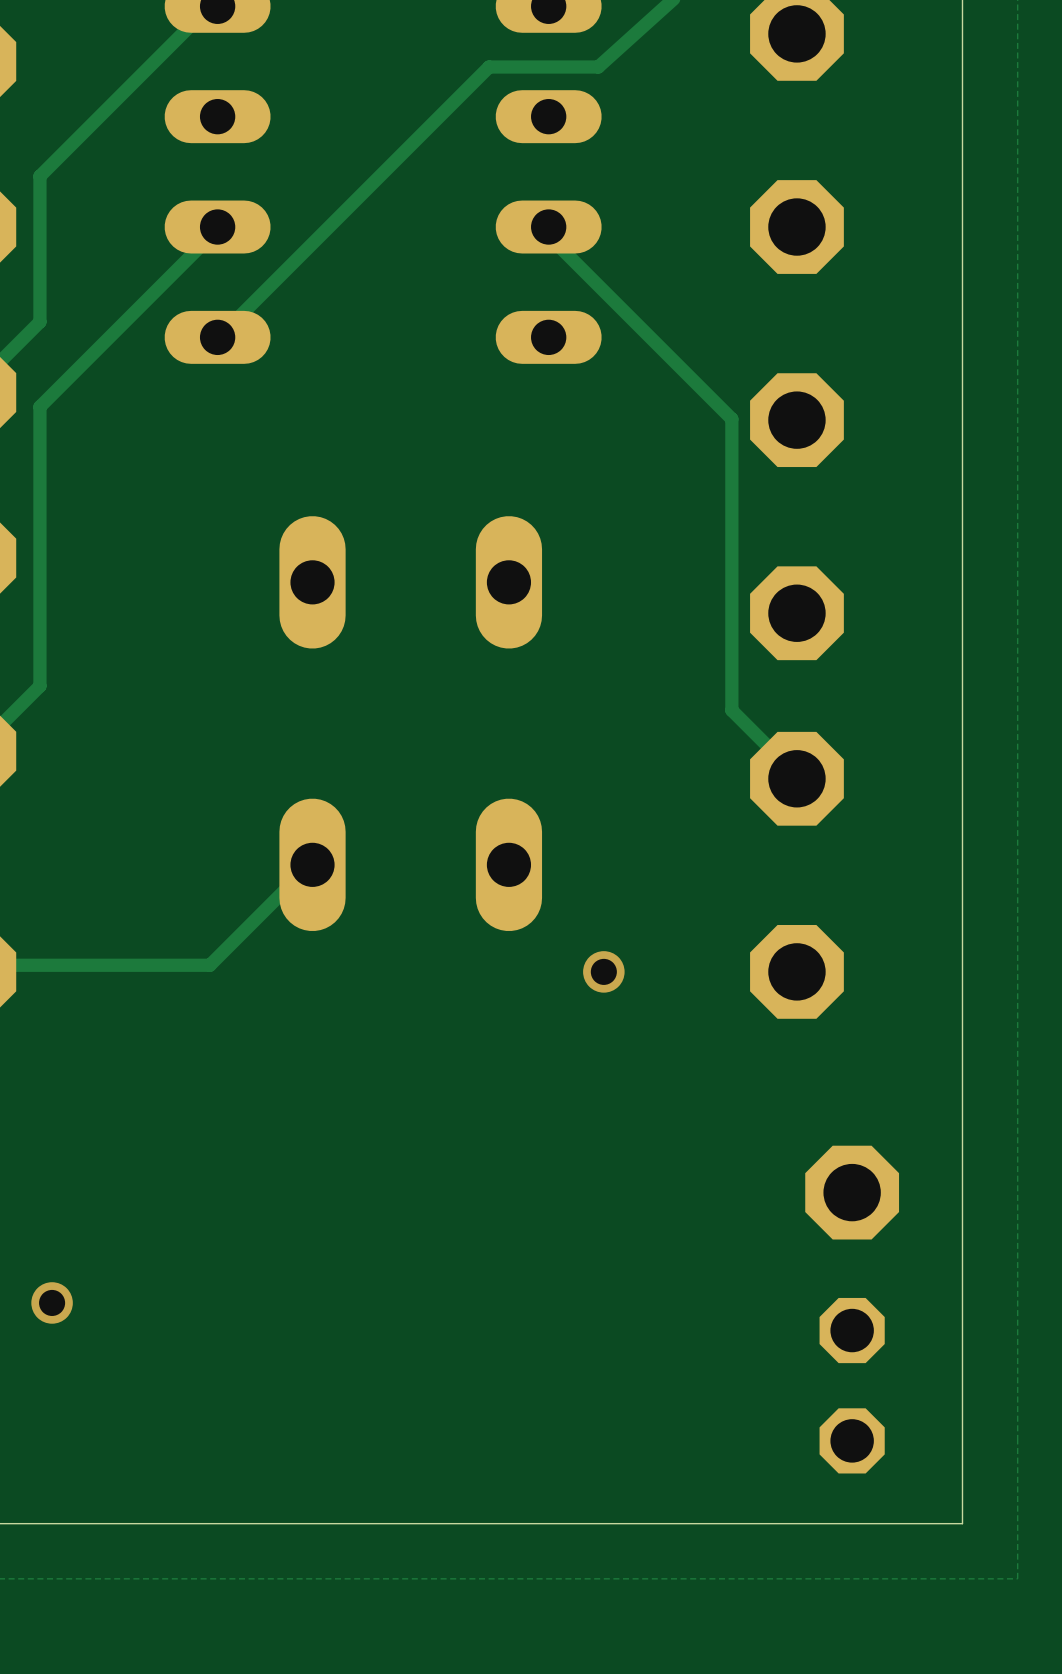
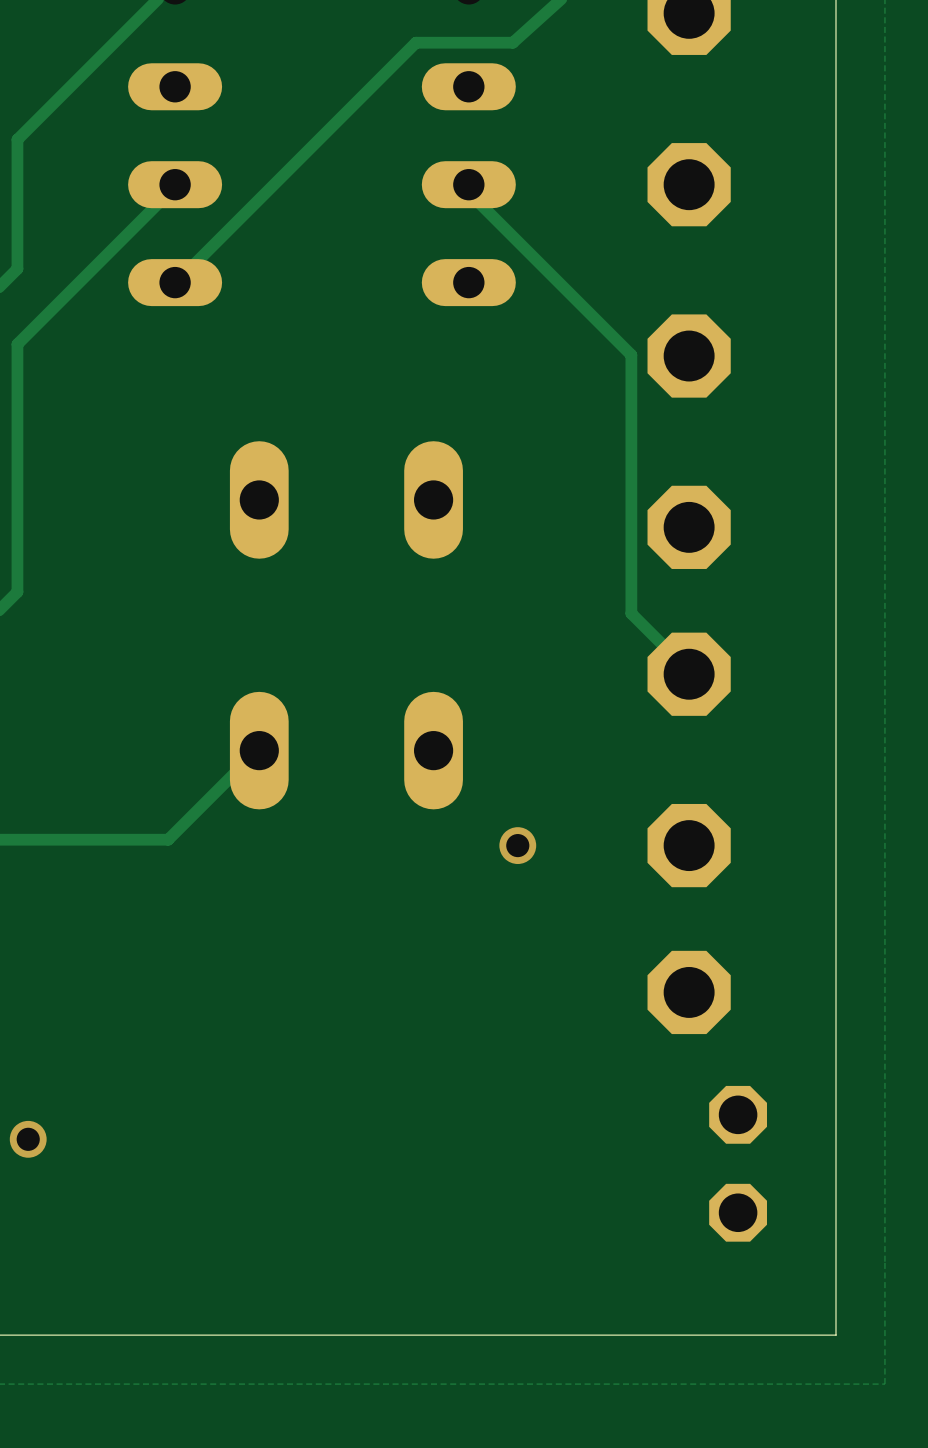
part position: (852, 1192) -> (689, 992)
part position: (852, 1385) -> (738, 1163)

